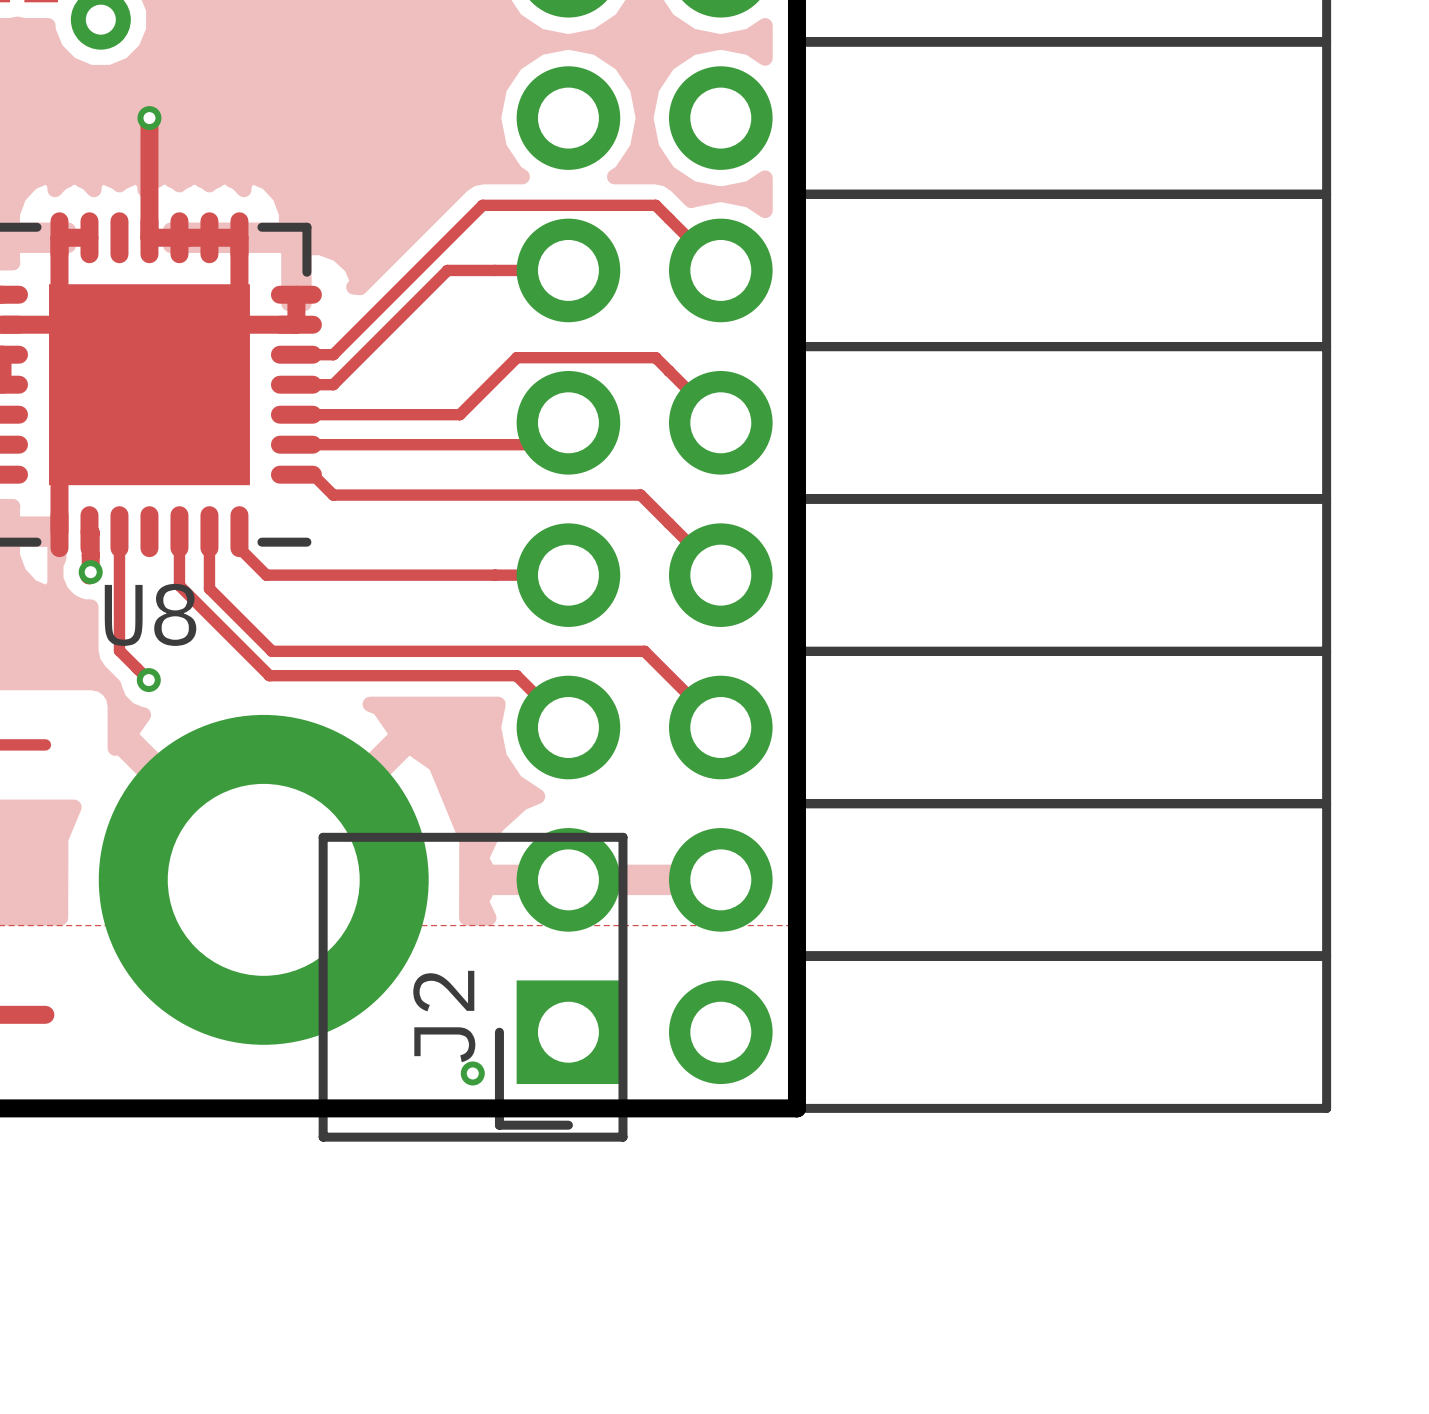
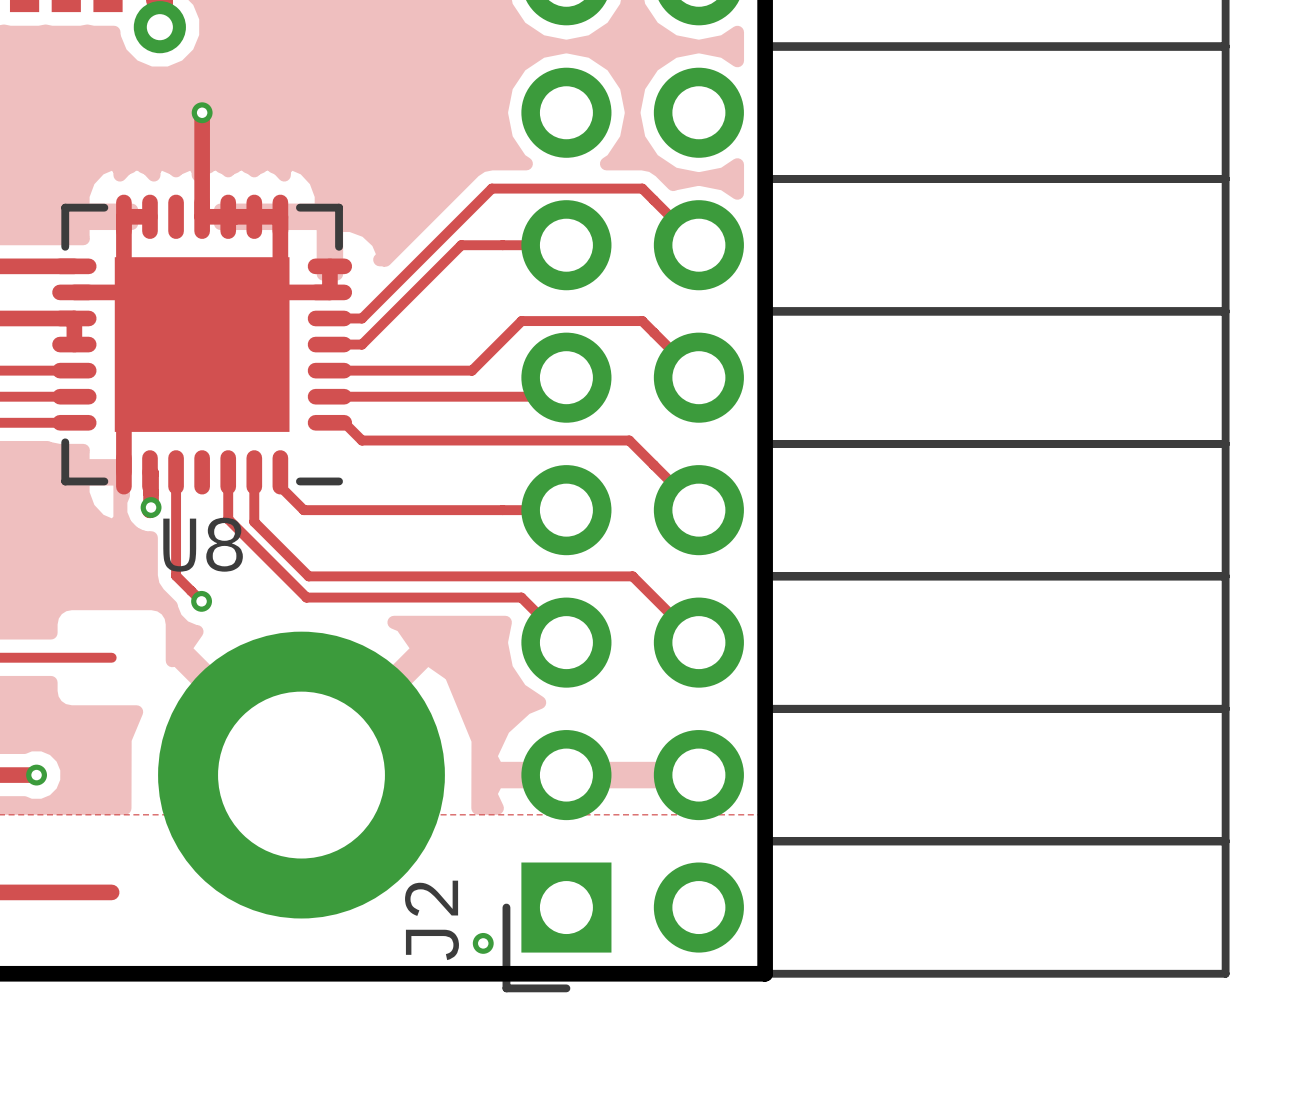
part: (473, 987) -> none
J2 name position: J2 (444, 1016) -> J2 (432, 920)

